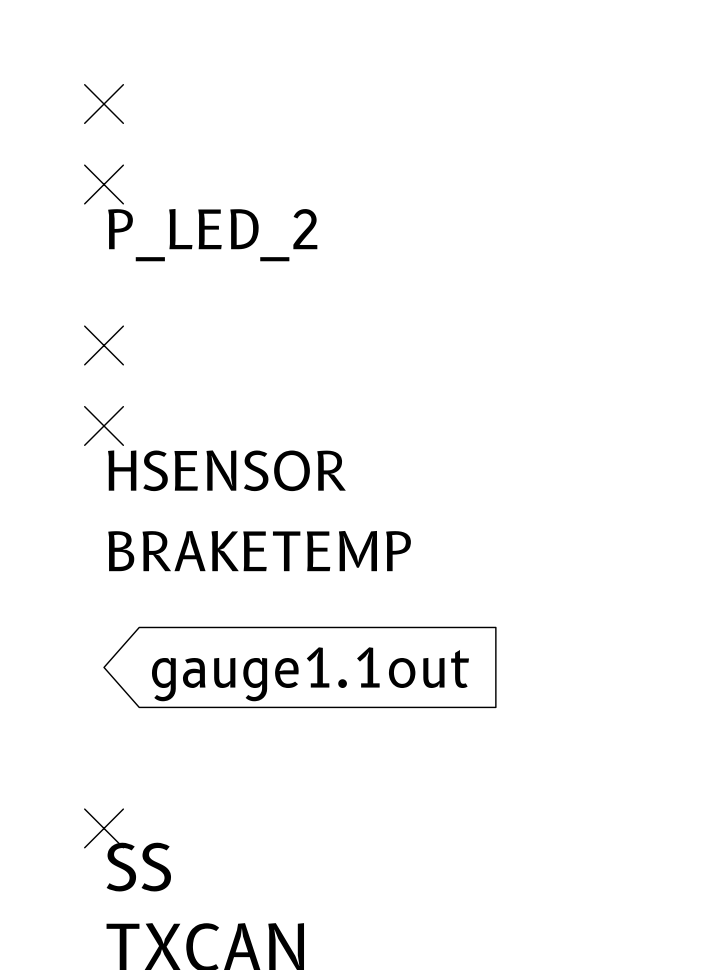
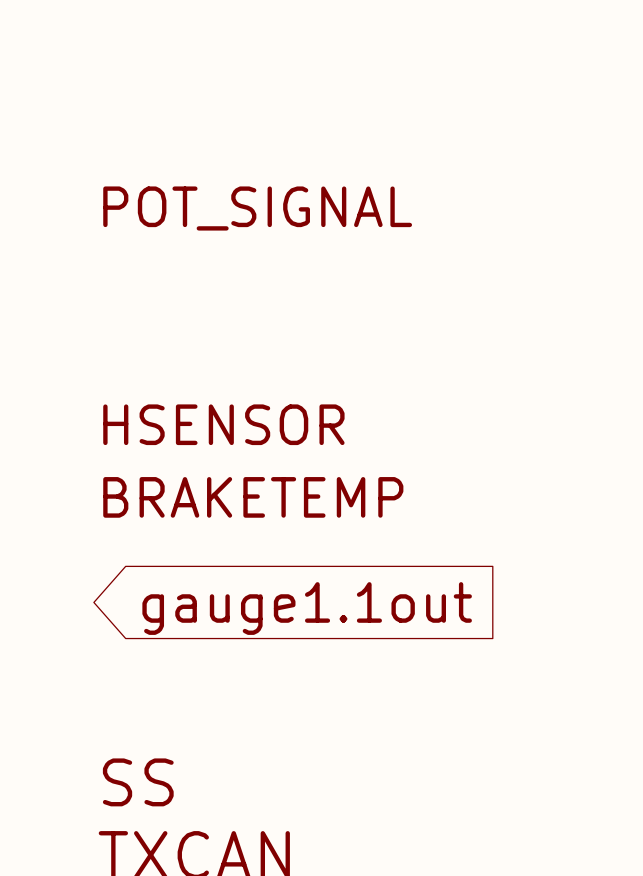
no-connect mark: (104, 104) -> none
no-connect mark: (104, 184) -> none
label: P_LED_2 (212, 235) -> POT_SIGNAL (257, 208)
no-connect mark: (104, 345) -> none
no-connect mark: (104, 425) -> none
no-connect mark: (104, 828) -> none

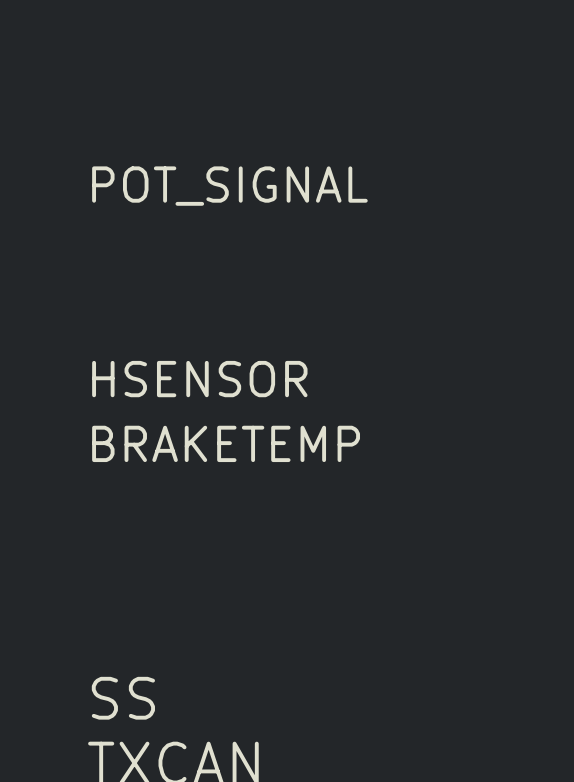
global label: gauge1.1out (307, 608) -> none

